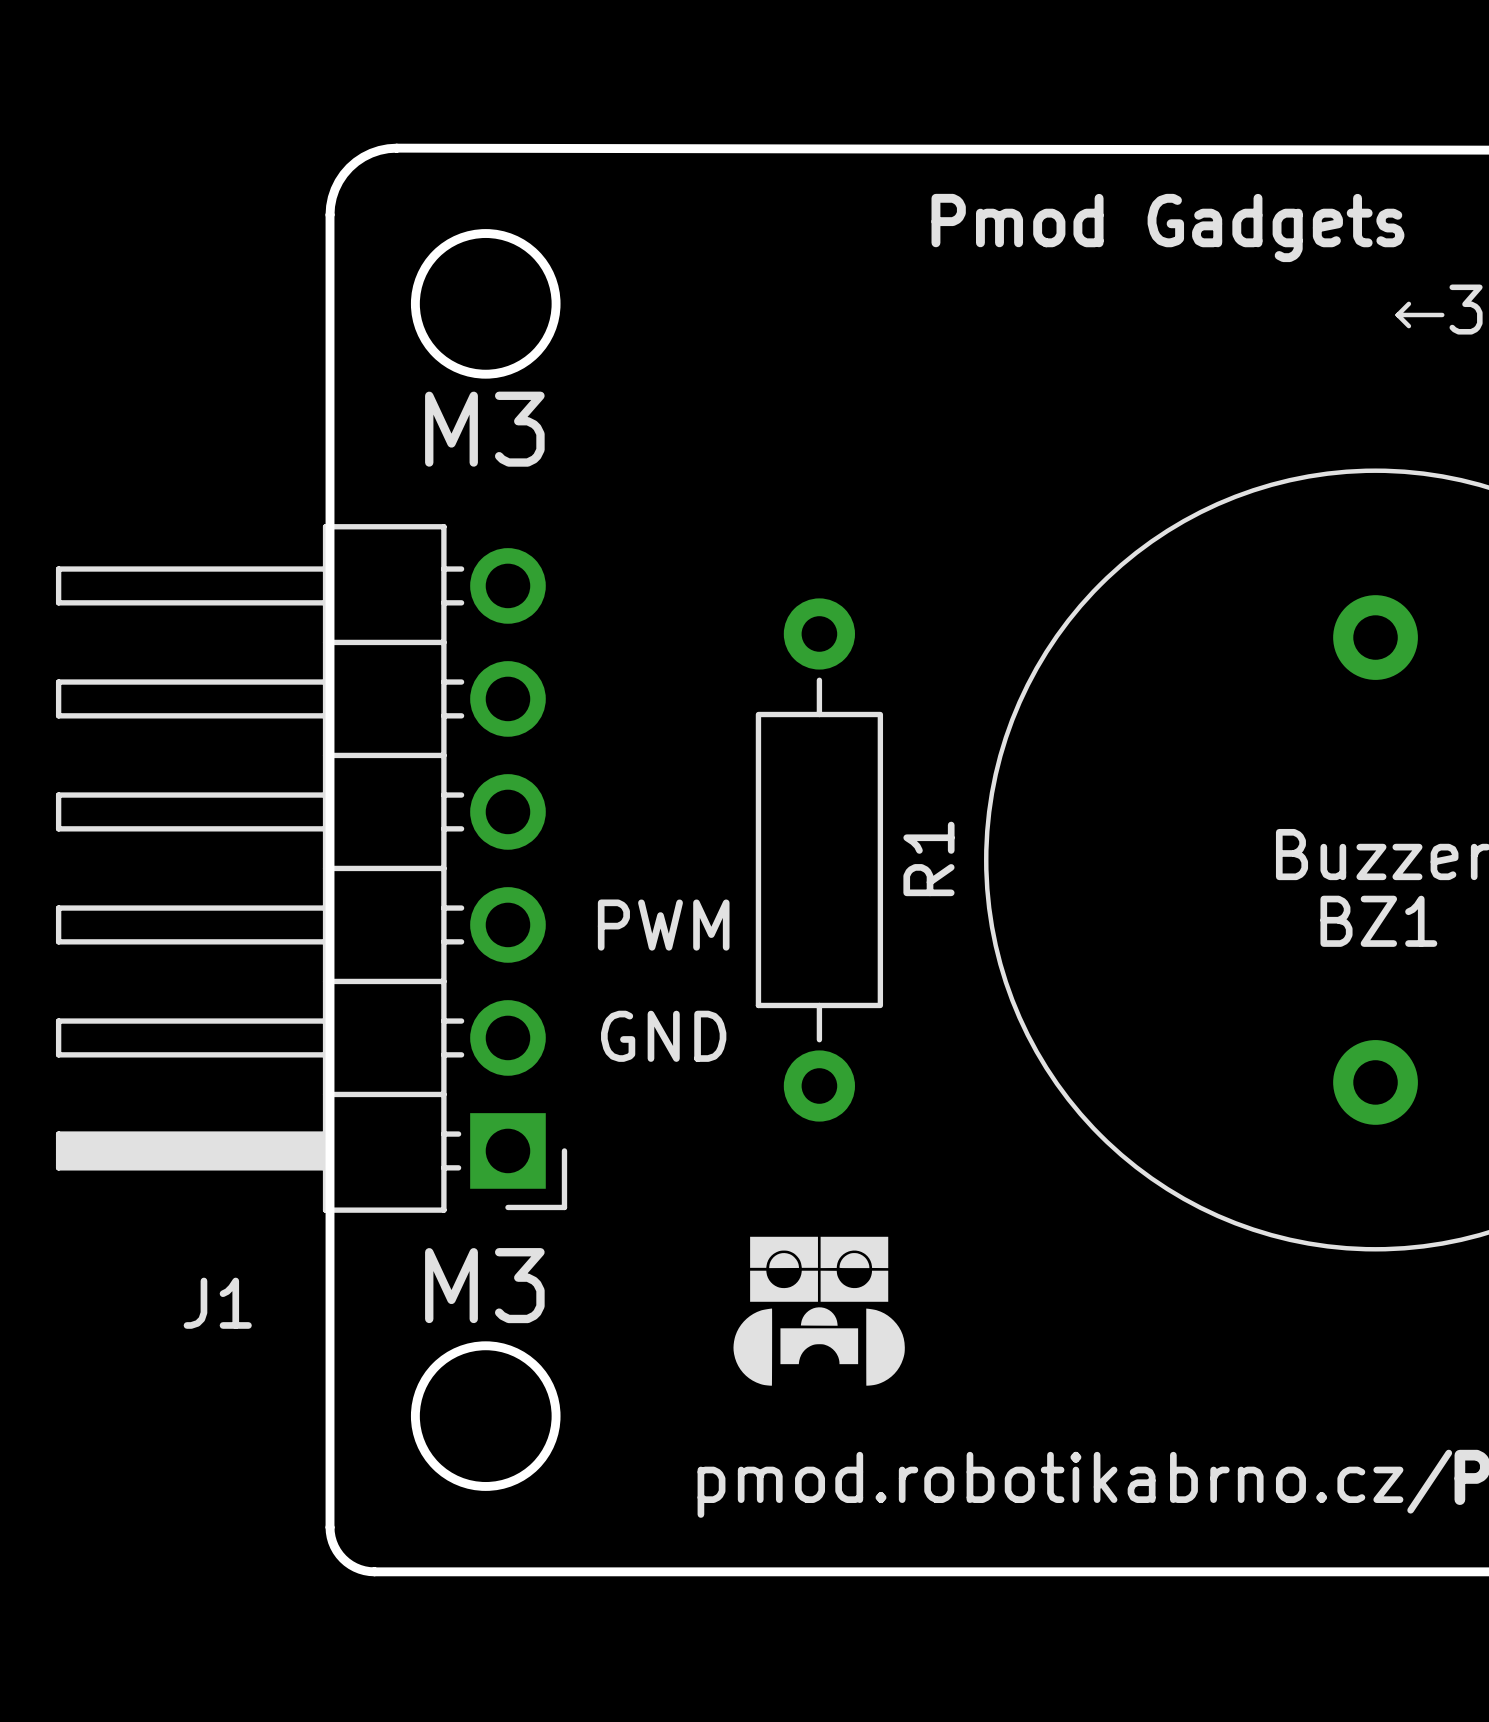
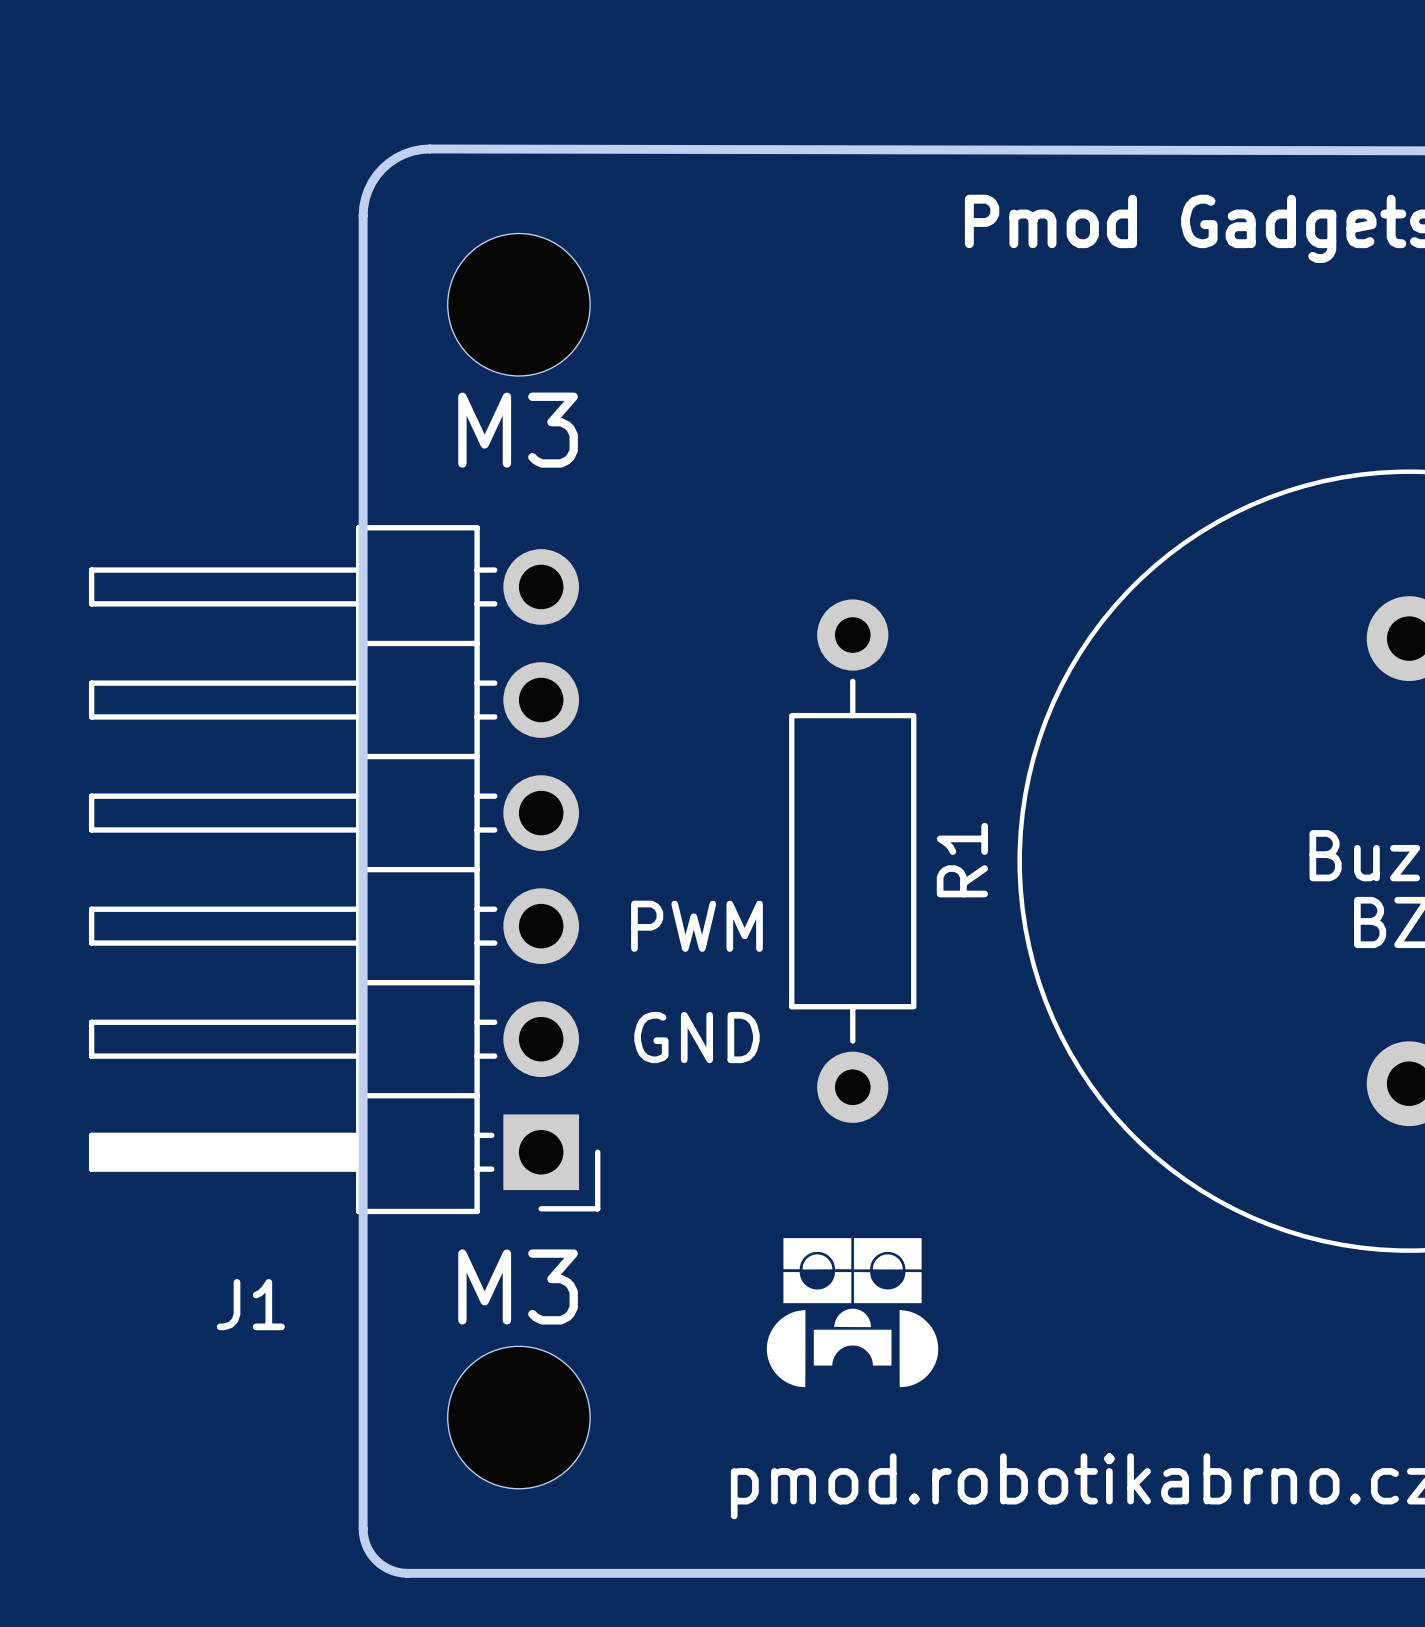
round board edge: [410, 229, 561, 379] -> none
part: none -> (518, 304)
round board edge: [410, 1341, 561, 1491] -> none
part: none -> (518, 1417)

